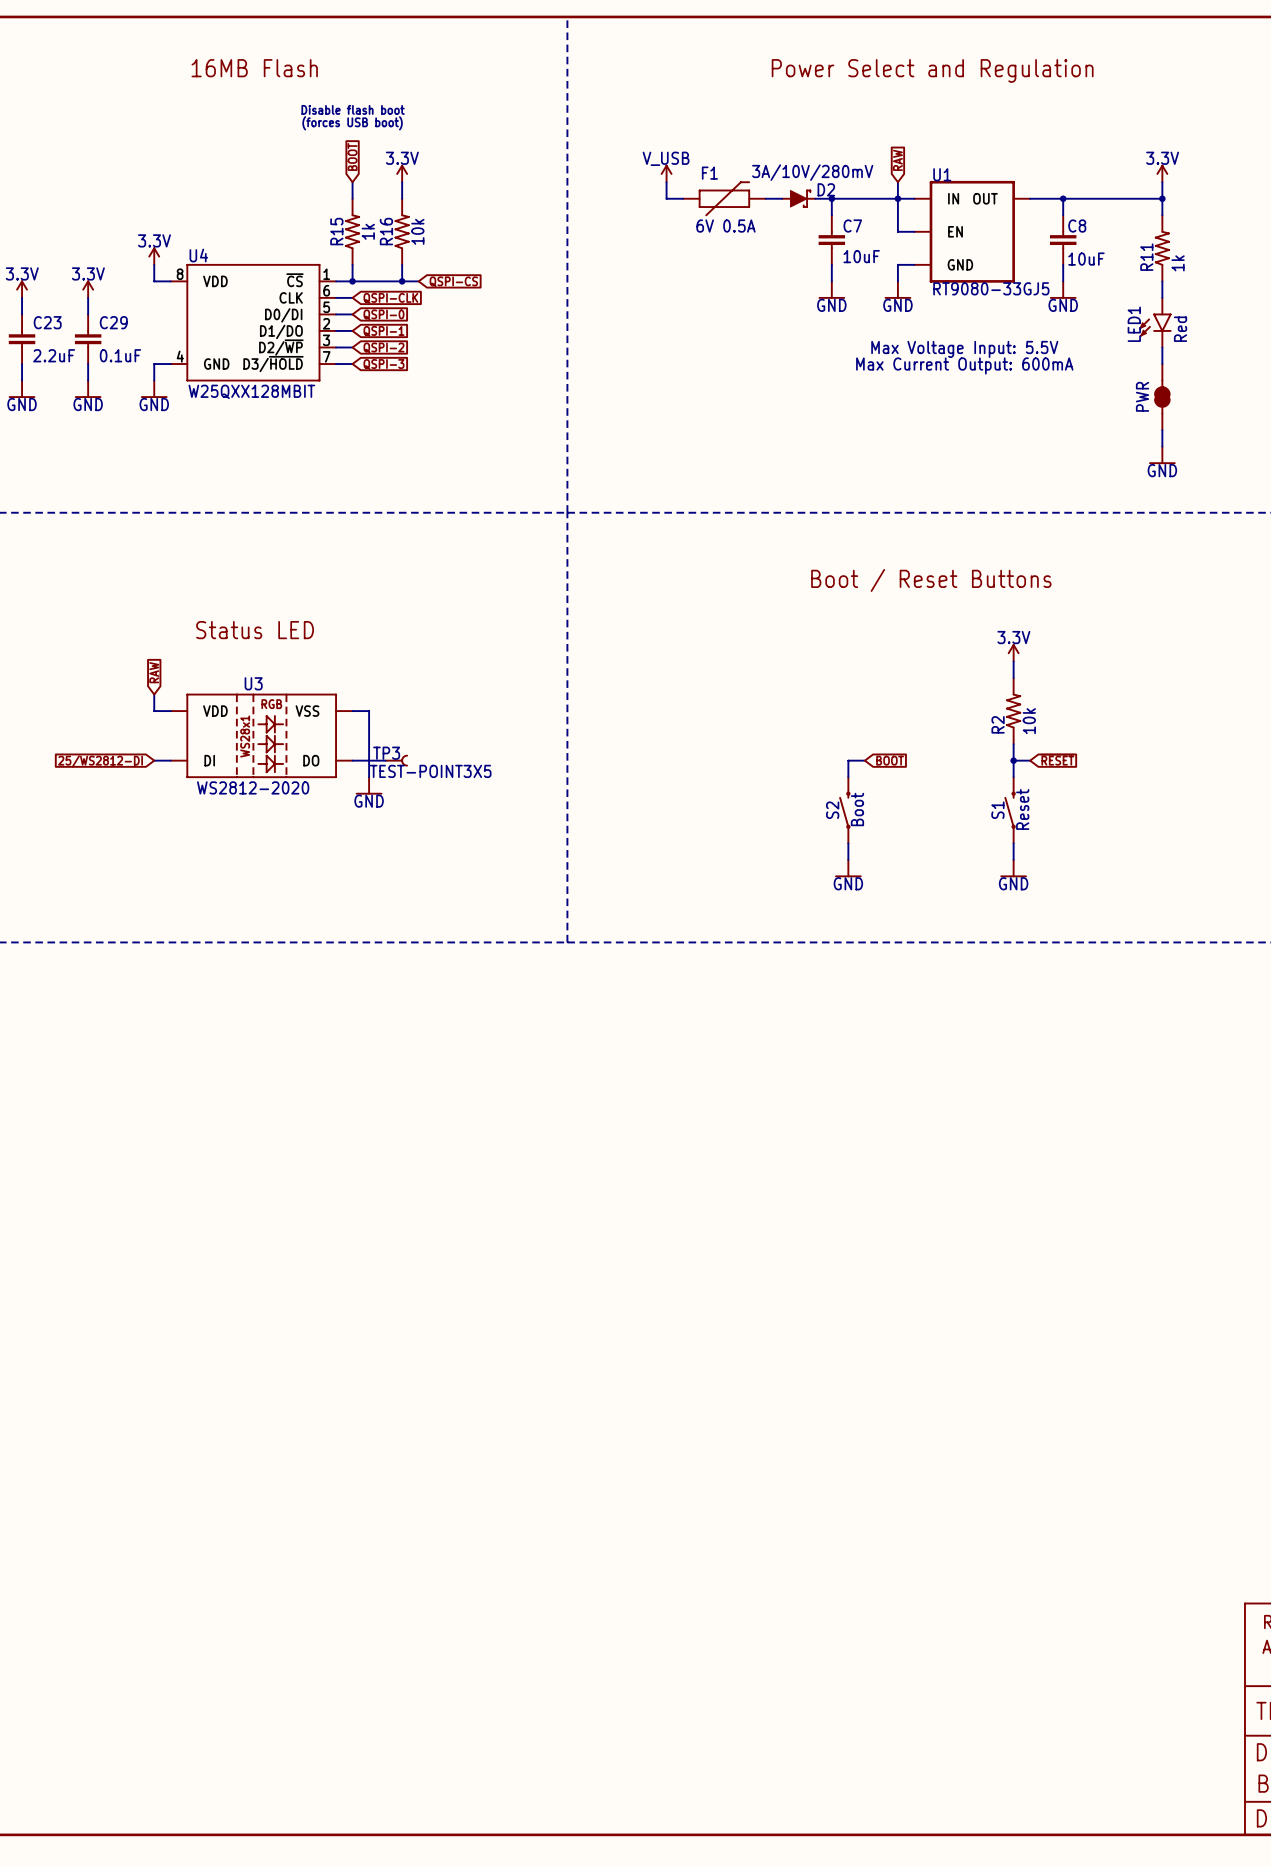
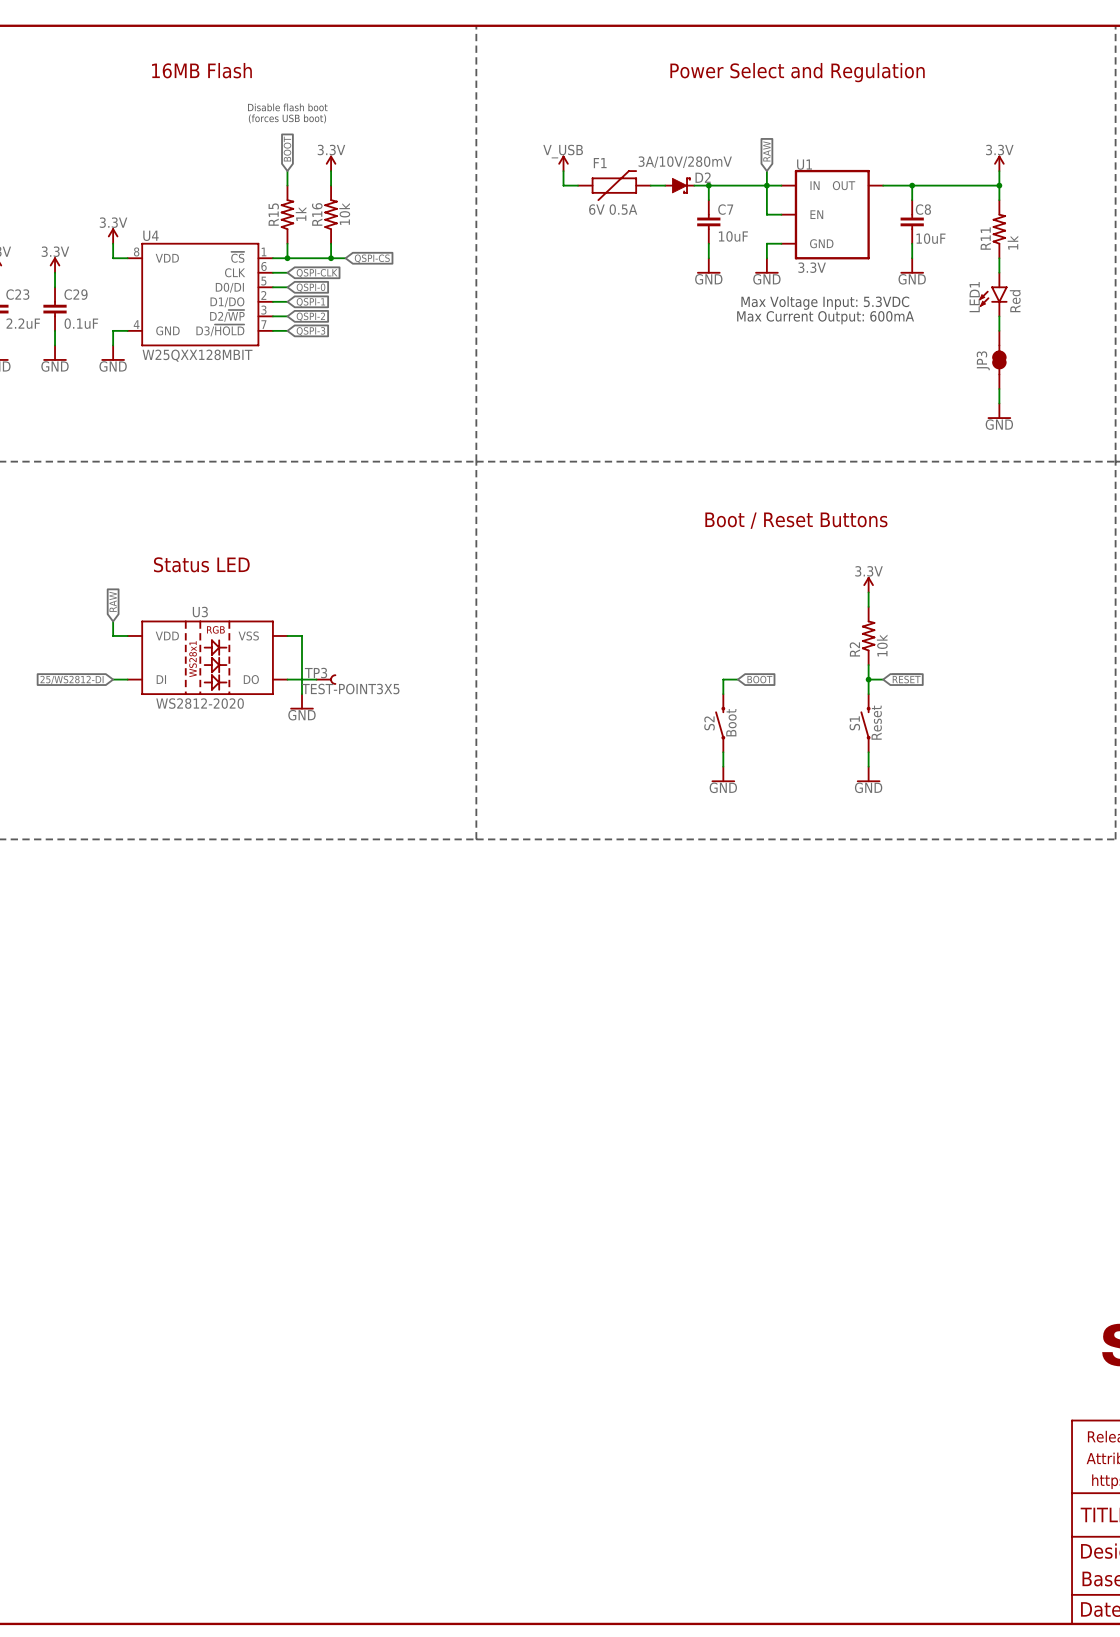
U1 value: RT9080-33GJ5 (991, 288) -> 3.3V (812, 267)
text: none -> Max Voltage Input: 5.3VDC (825, 303)
text: Max Voltage Input: 5.5V (964, 349) -> Max Current Output: 600mA (825, 317)
text: Max Current Output: 600mA (964, 365) -> none
PWR name: PWR (1142, 396) -> JP3 (983, 360)

